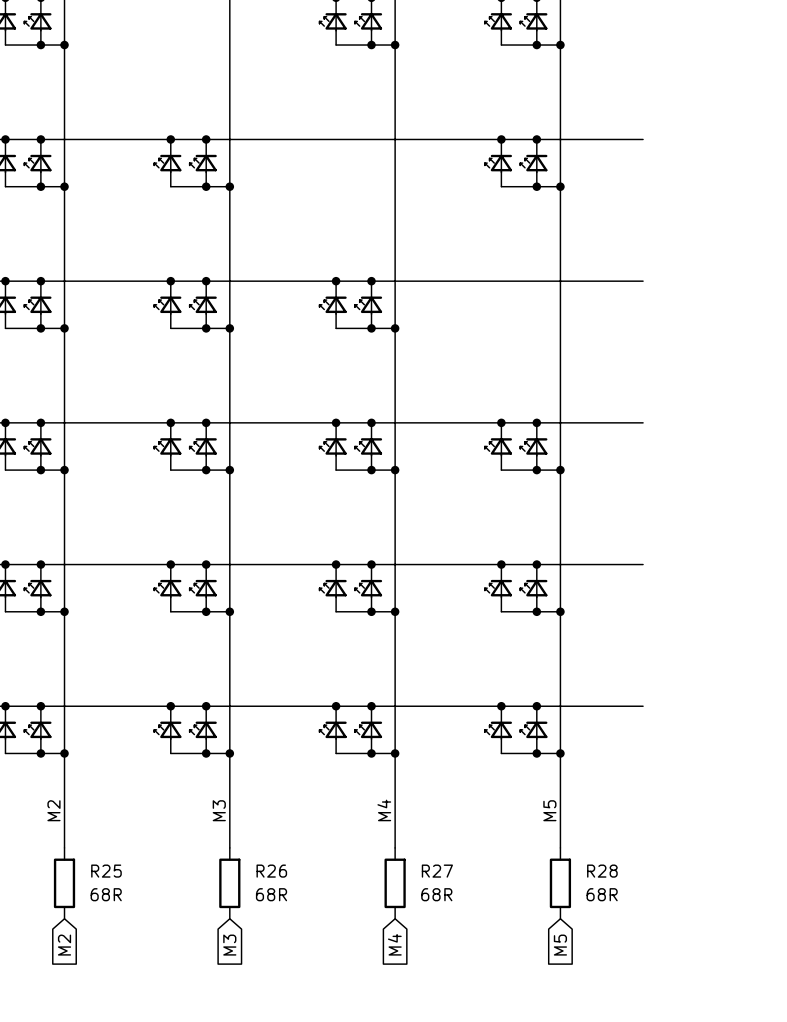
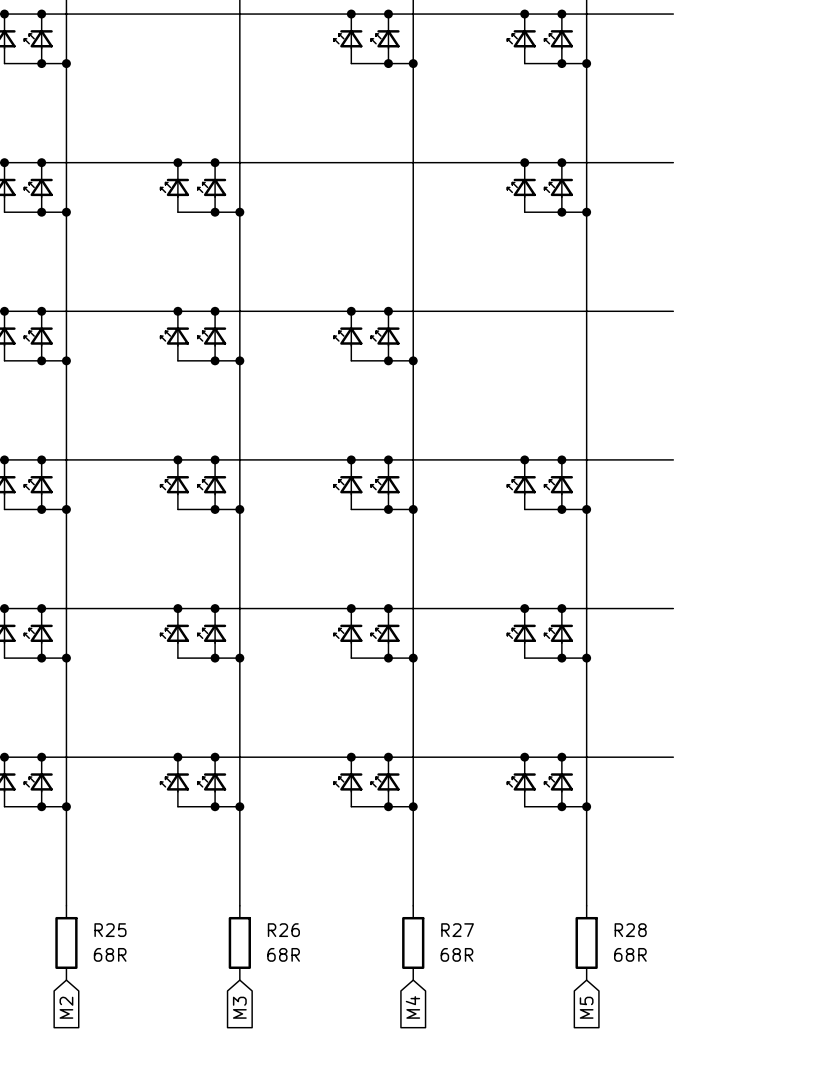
label: M2 (53, 810) -> none
label: M3 (219, 810) -> none
label: M4 (384, 810) -> none
label: M5 (549, 810) -> none

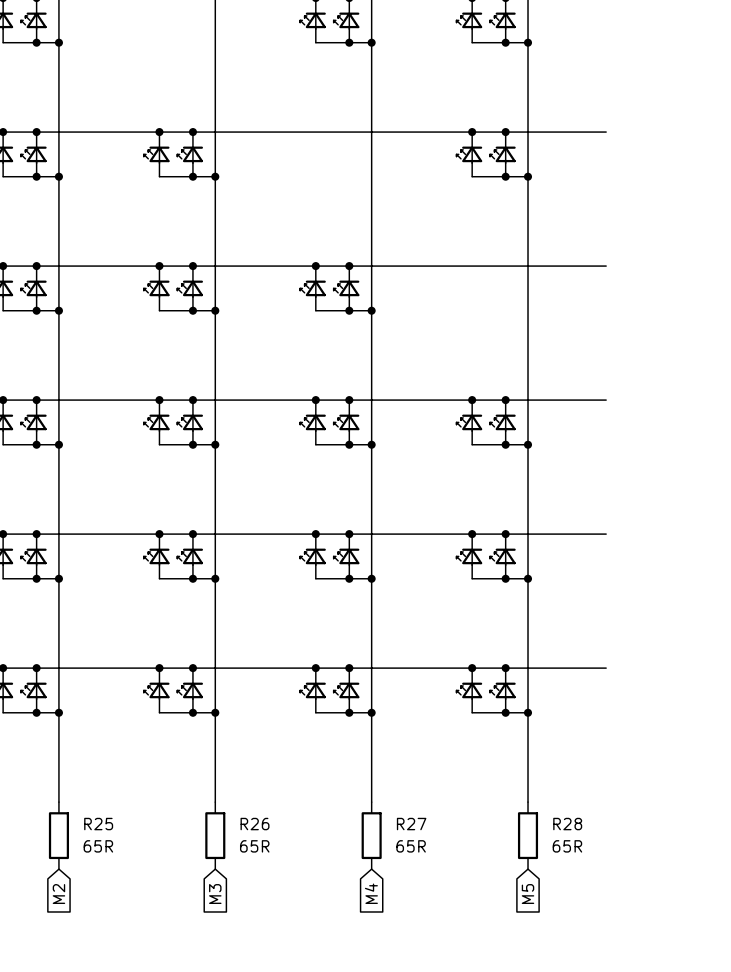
R25 value: 68R (110, 954) -> 65R (98, 846)
R26 value: 68R (283, 954) -> 65R (254, 846)
R27 value: 68R (456, 954) -> 65R (411, 846)
R28 value: 68R (630, 954) -> 65R (567, 846)

